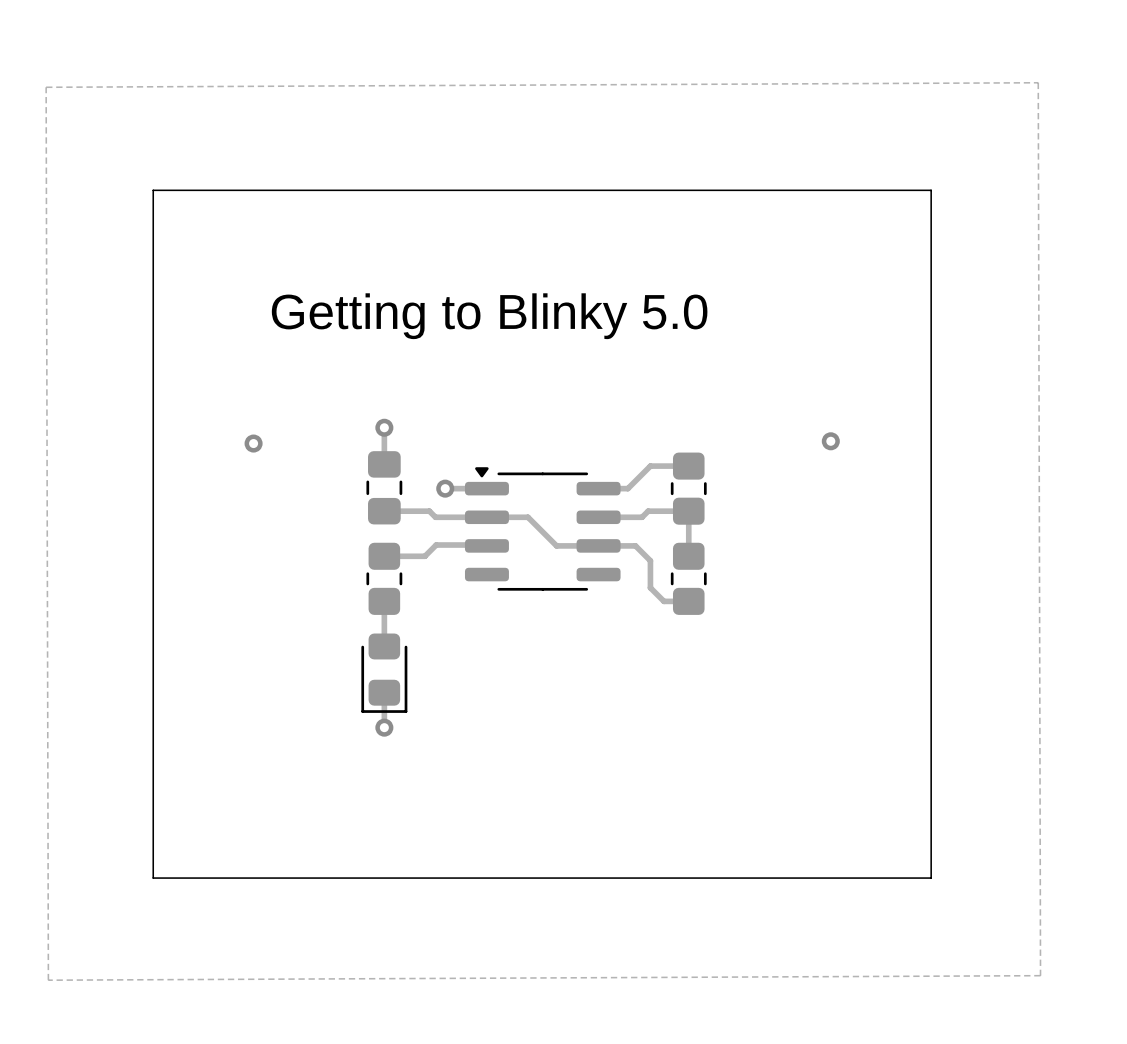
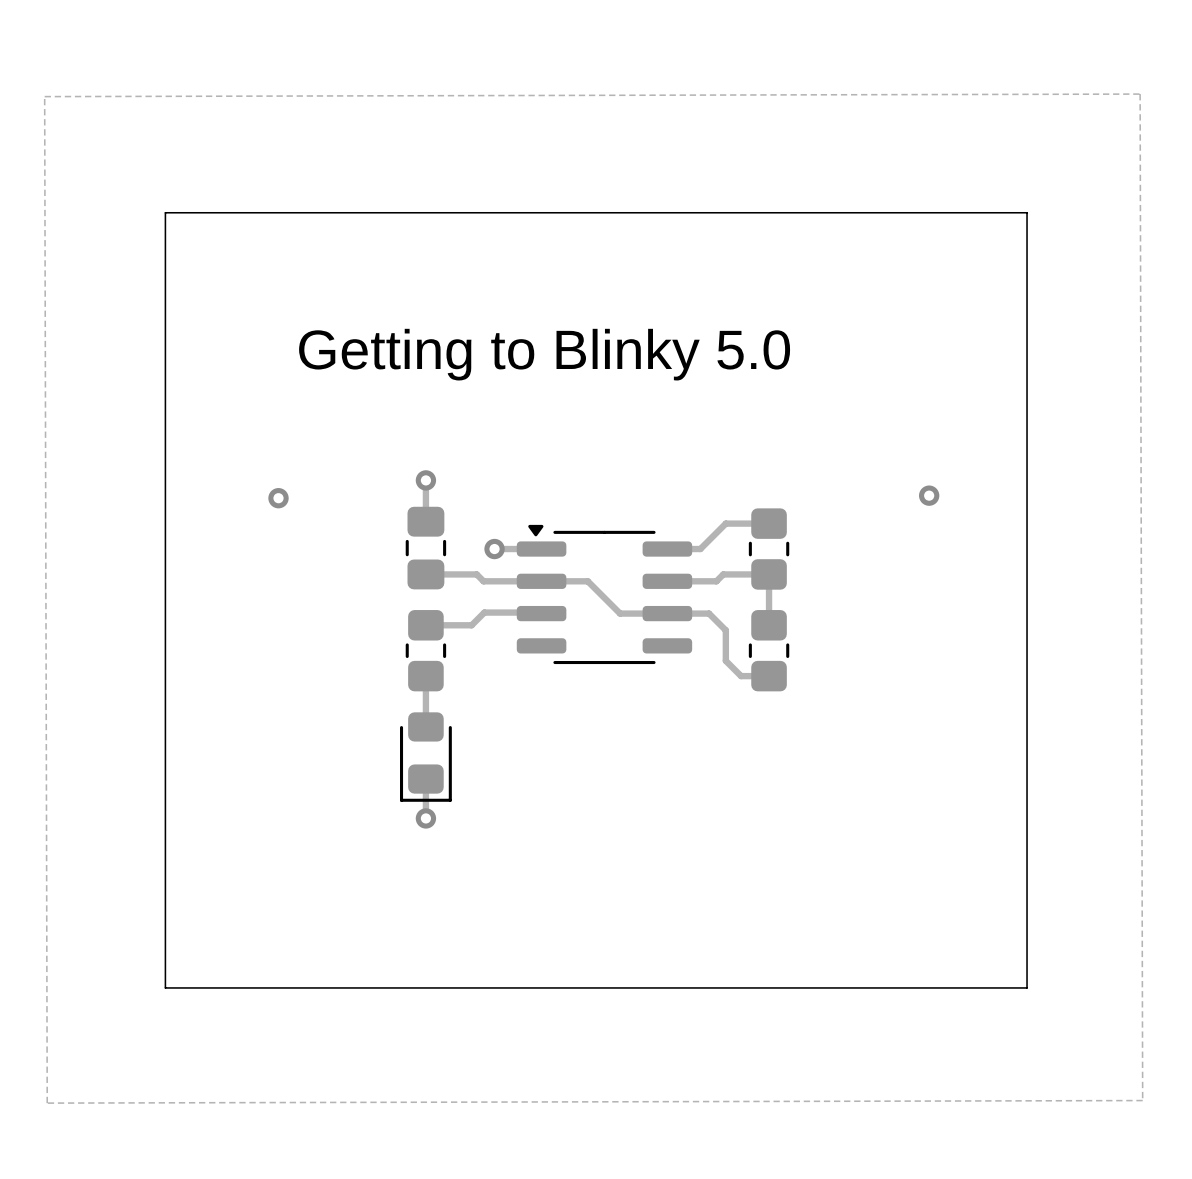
zone outline: (46, 87) (1038, 82) (1040, 975) (48, 980) -> (44, 96) (1140, 94) (1142, 1100) (47, 1103)
board edge: (917, 190) (931, 190) (931, 878) (917, 878) -> (1027, 212) (1027, 987)

